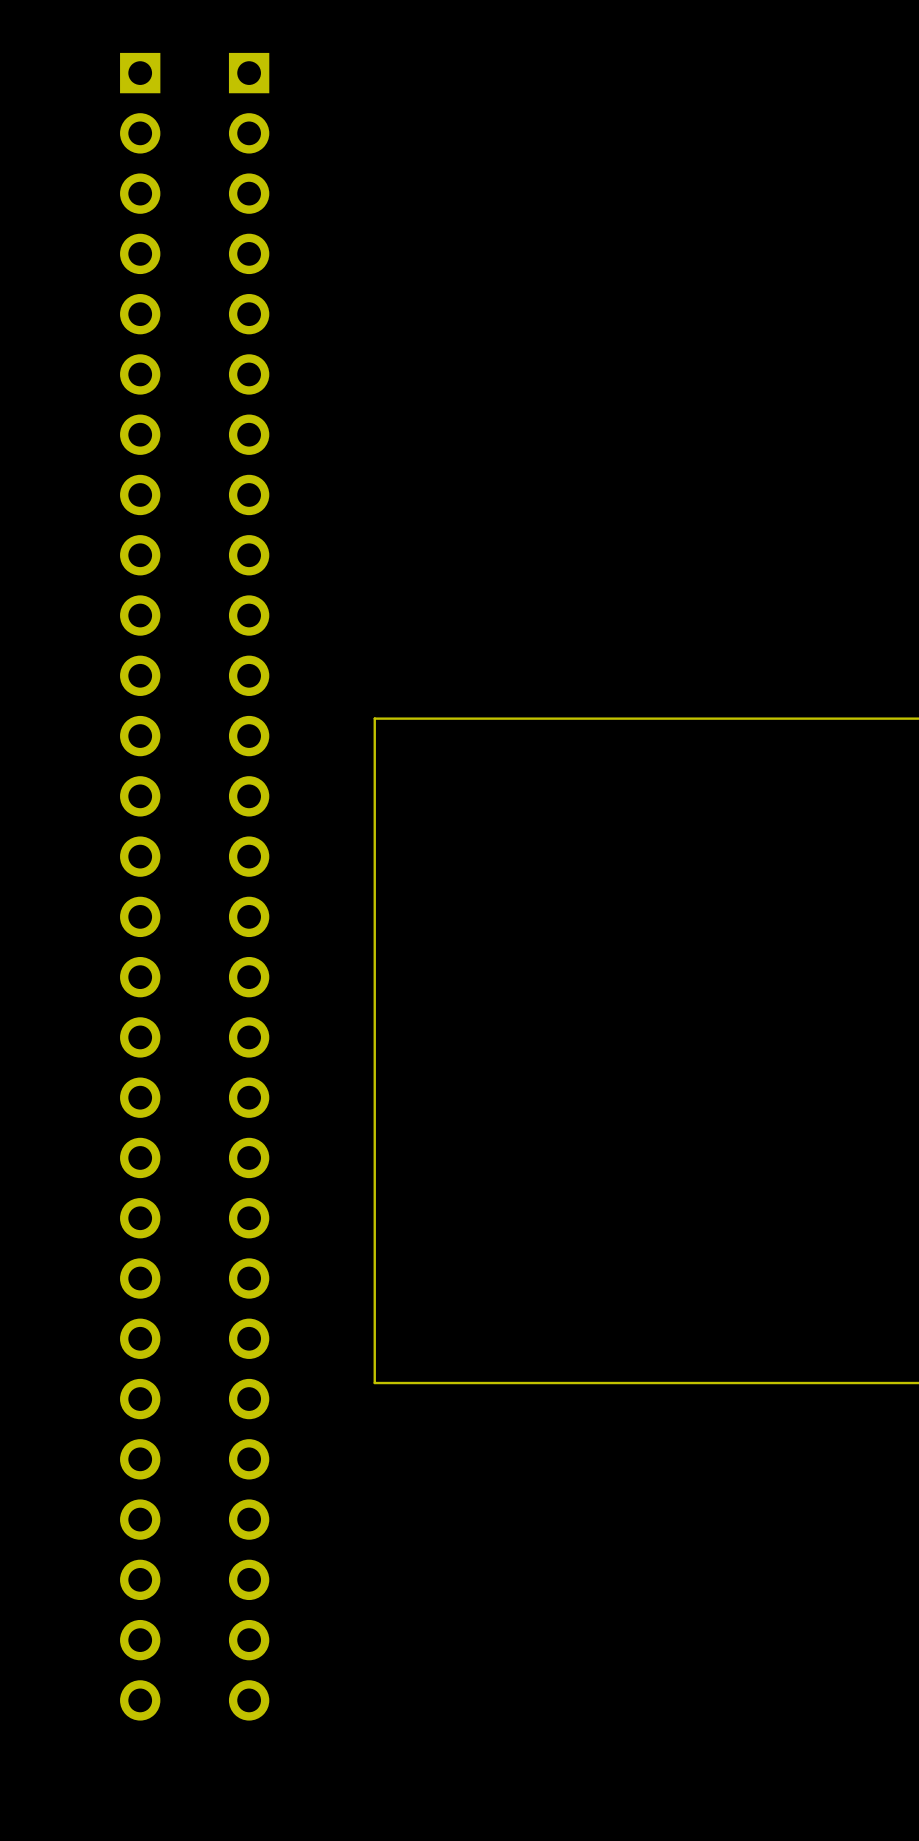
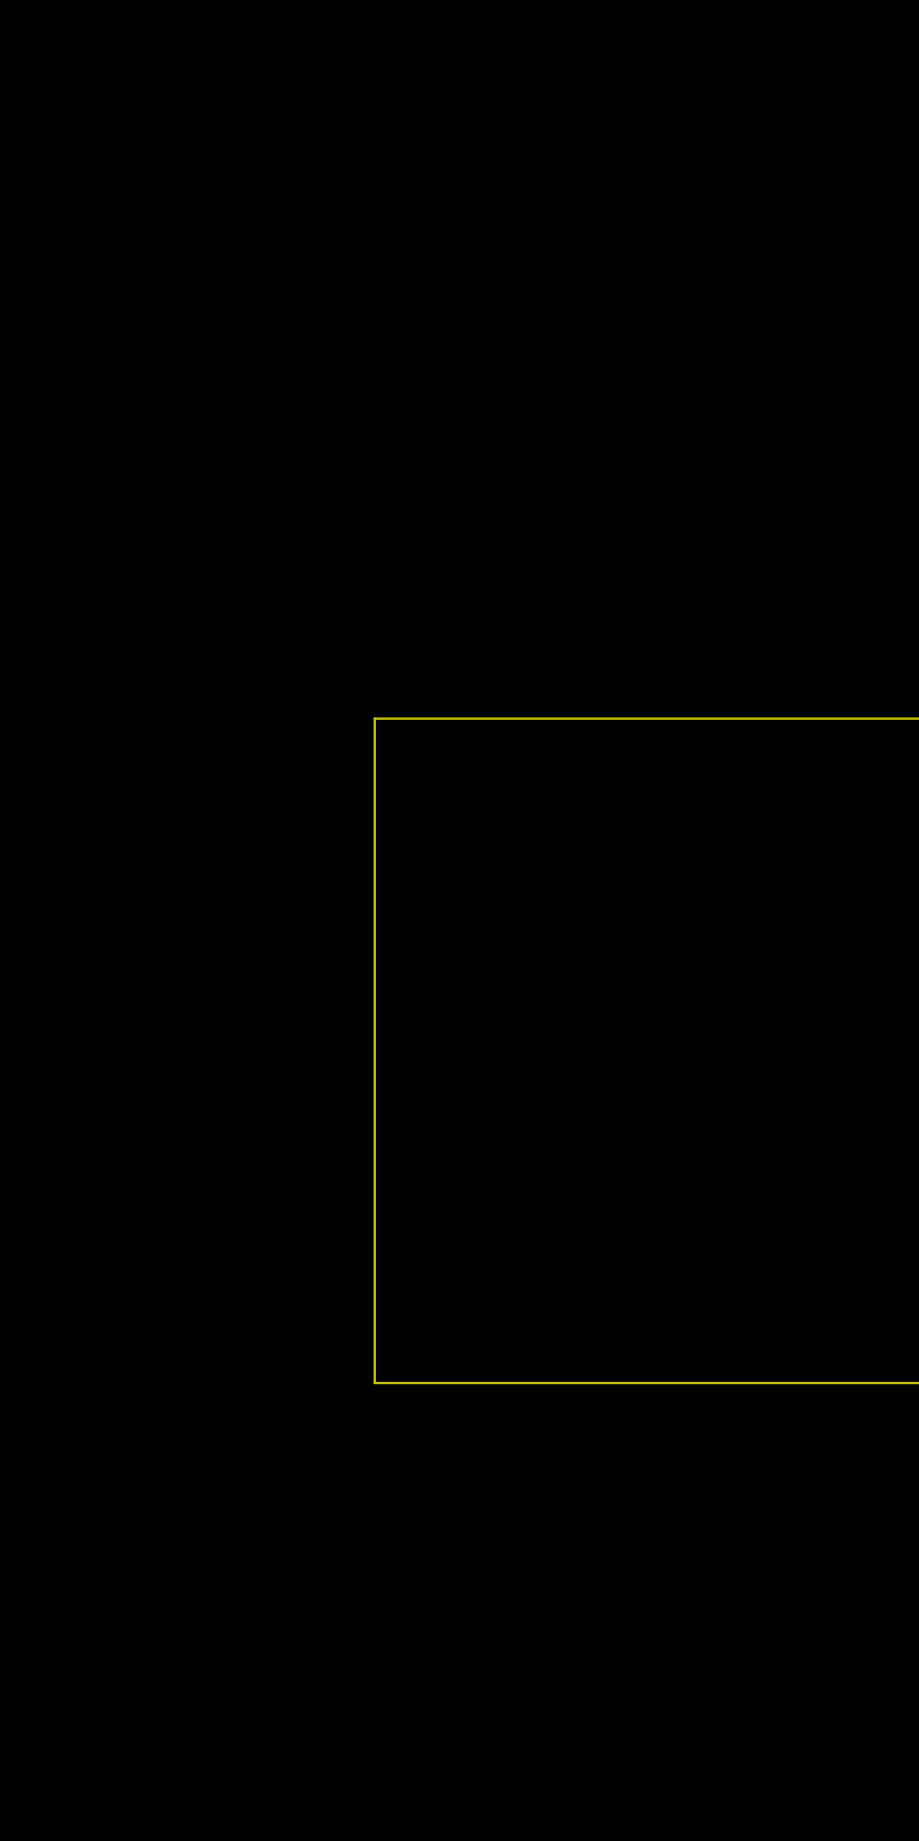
part: (140, 886) -> none
part: (249, 886) -> none

